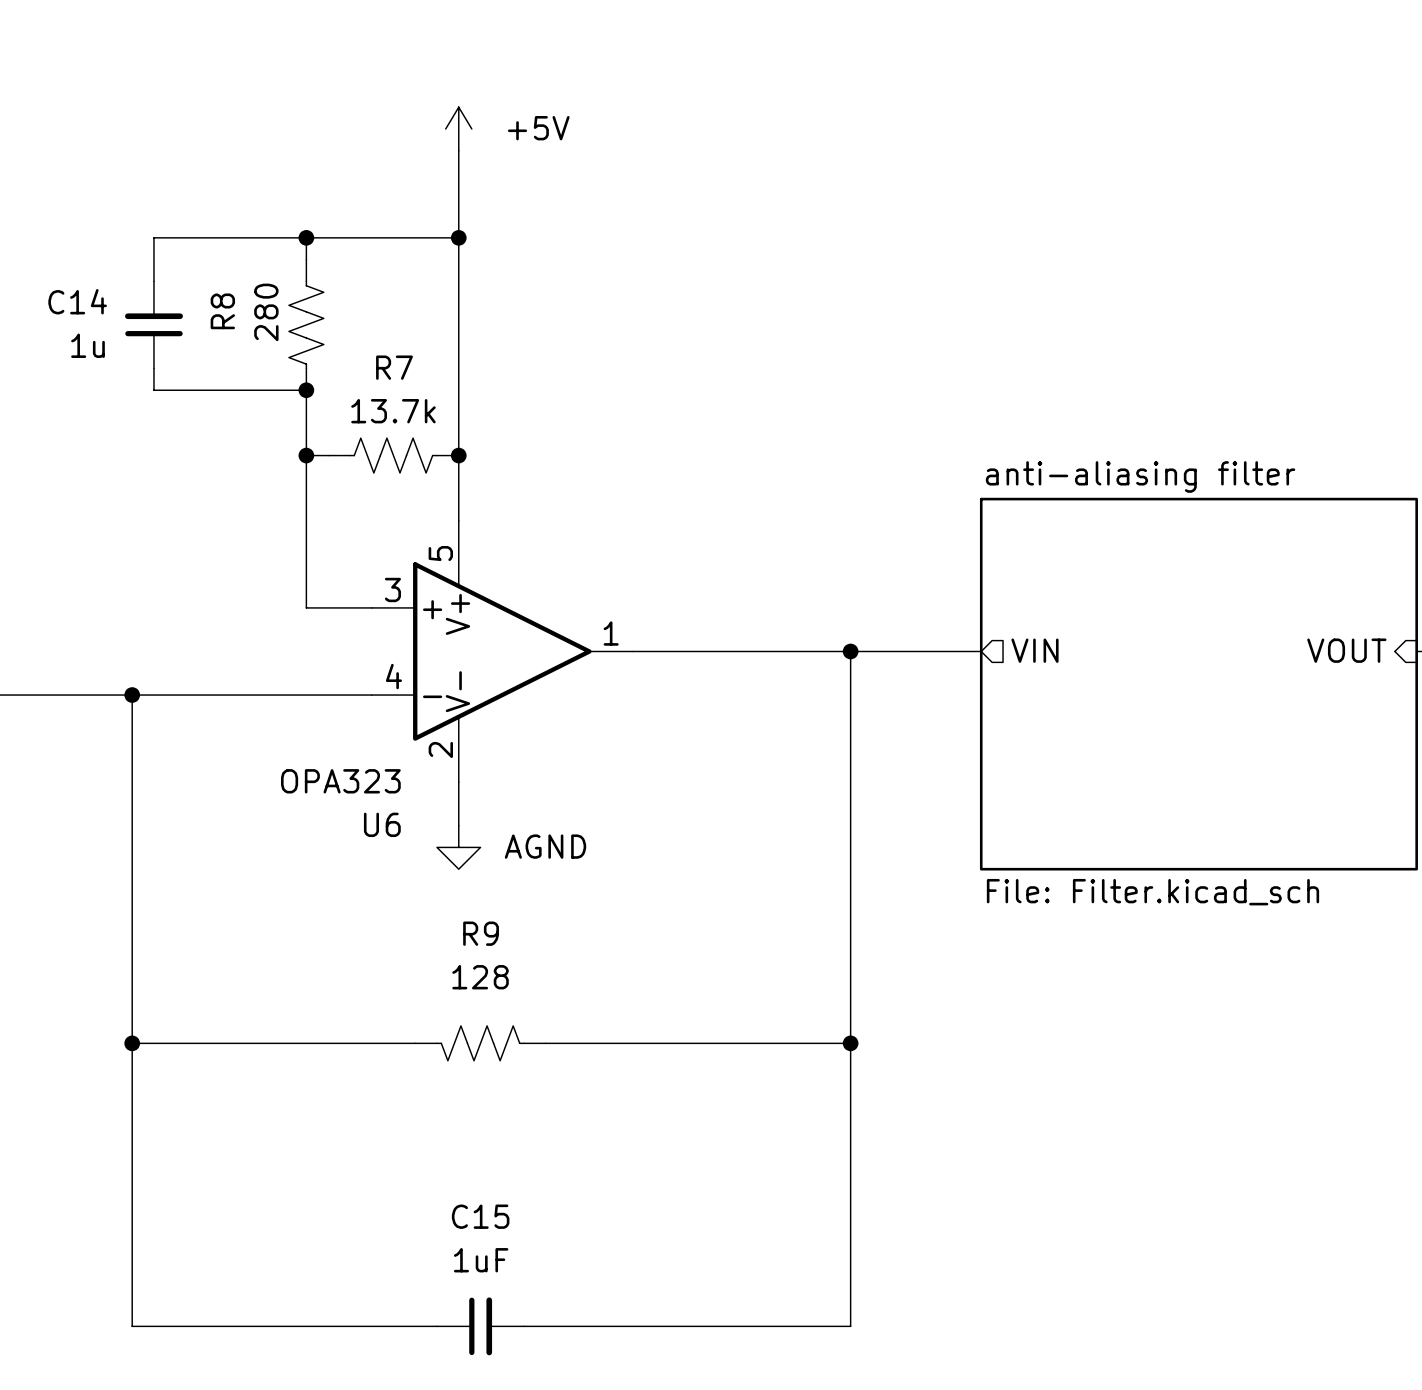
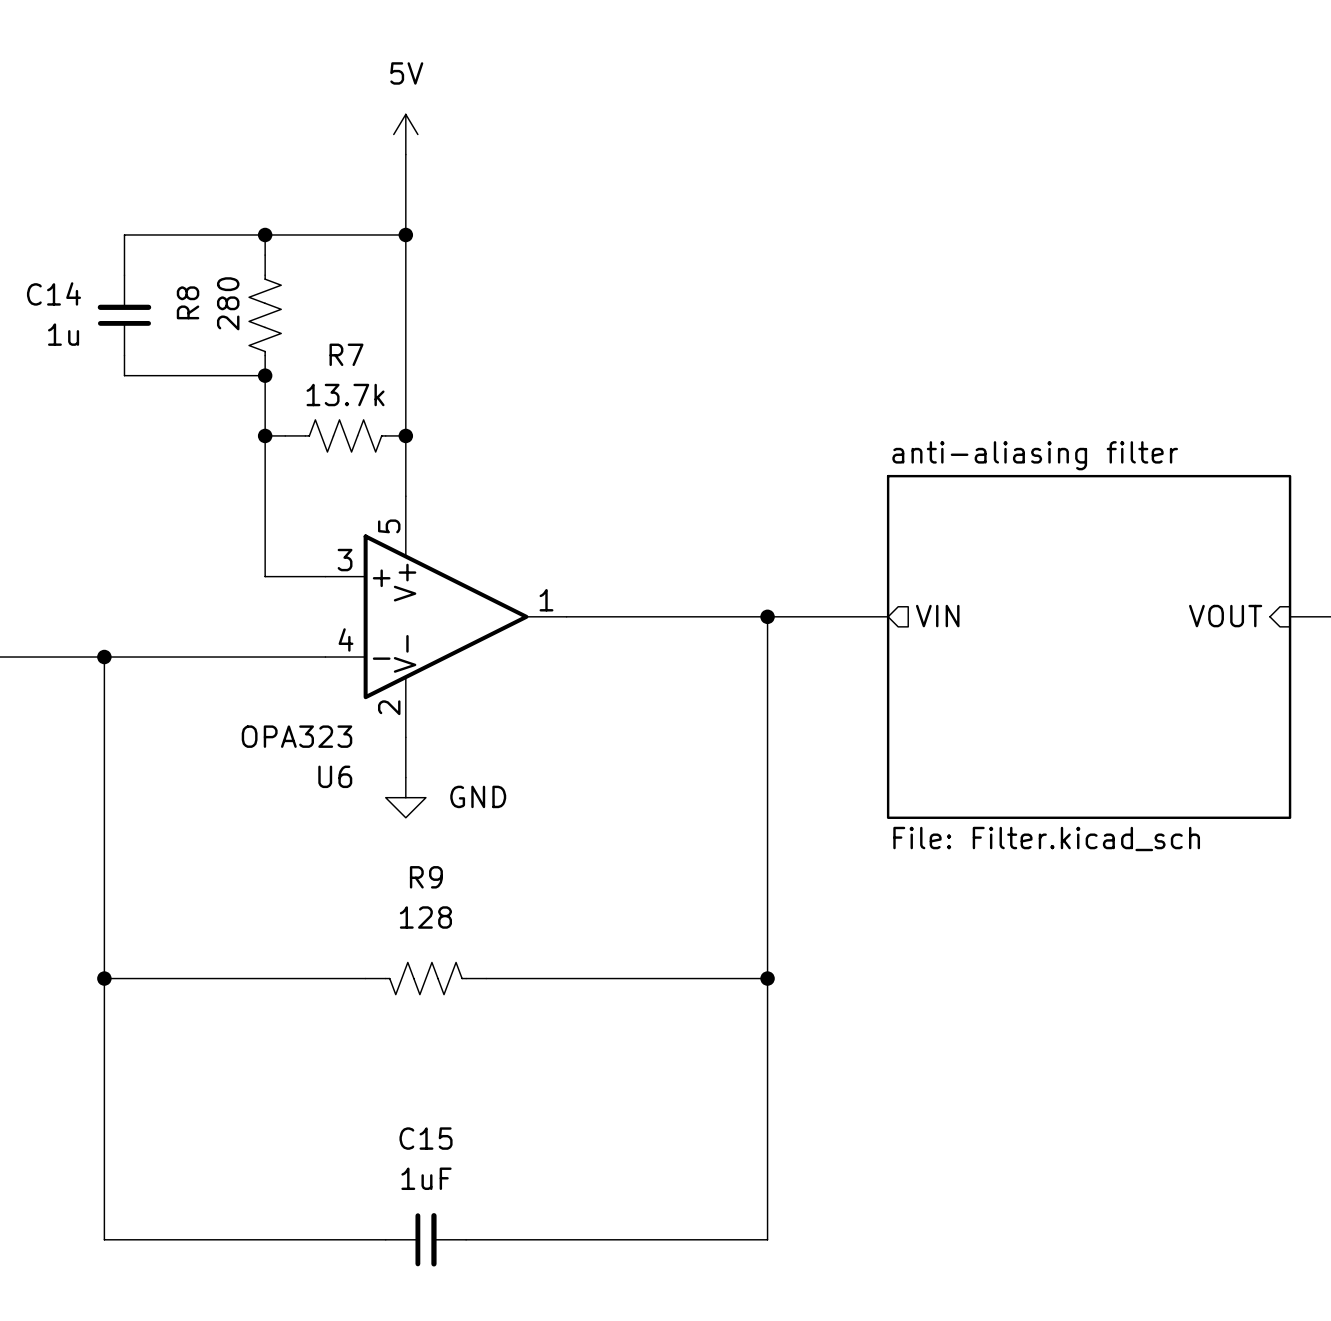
power symbol: +5V (458, 129) -> 5V (405, 134)
power symbol: AGND (458, 847) -> GND (405, 797)

